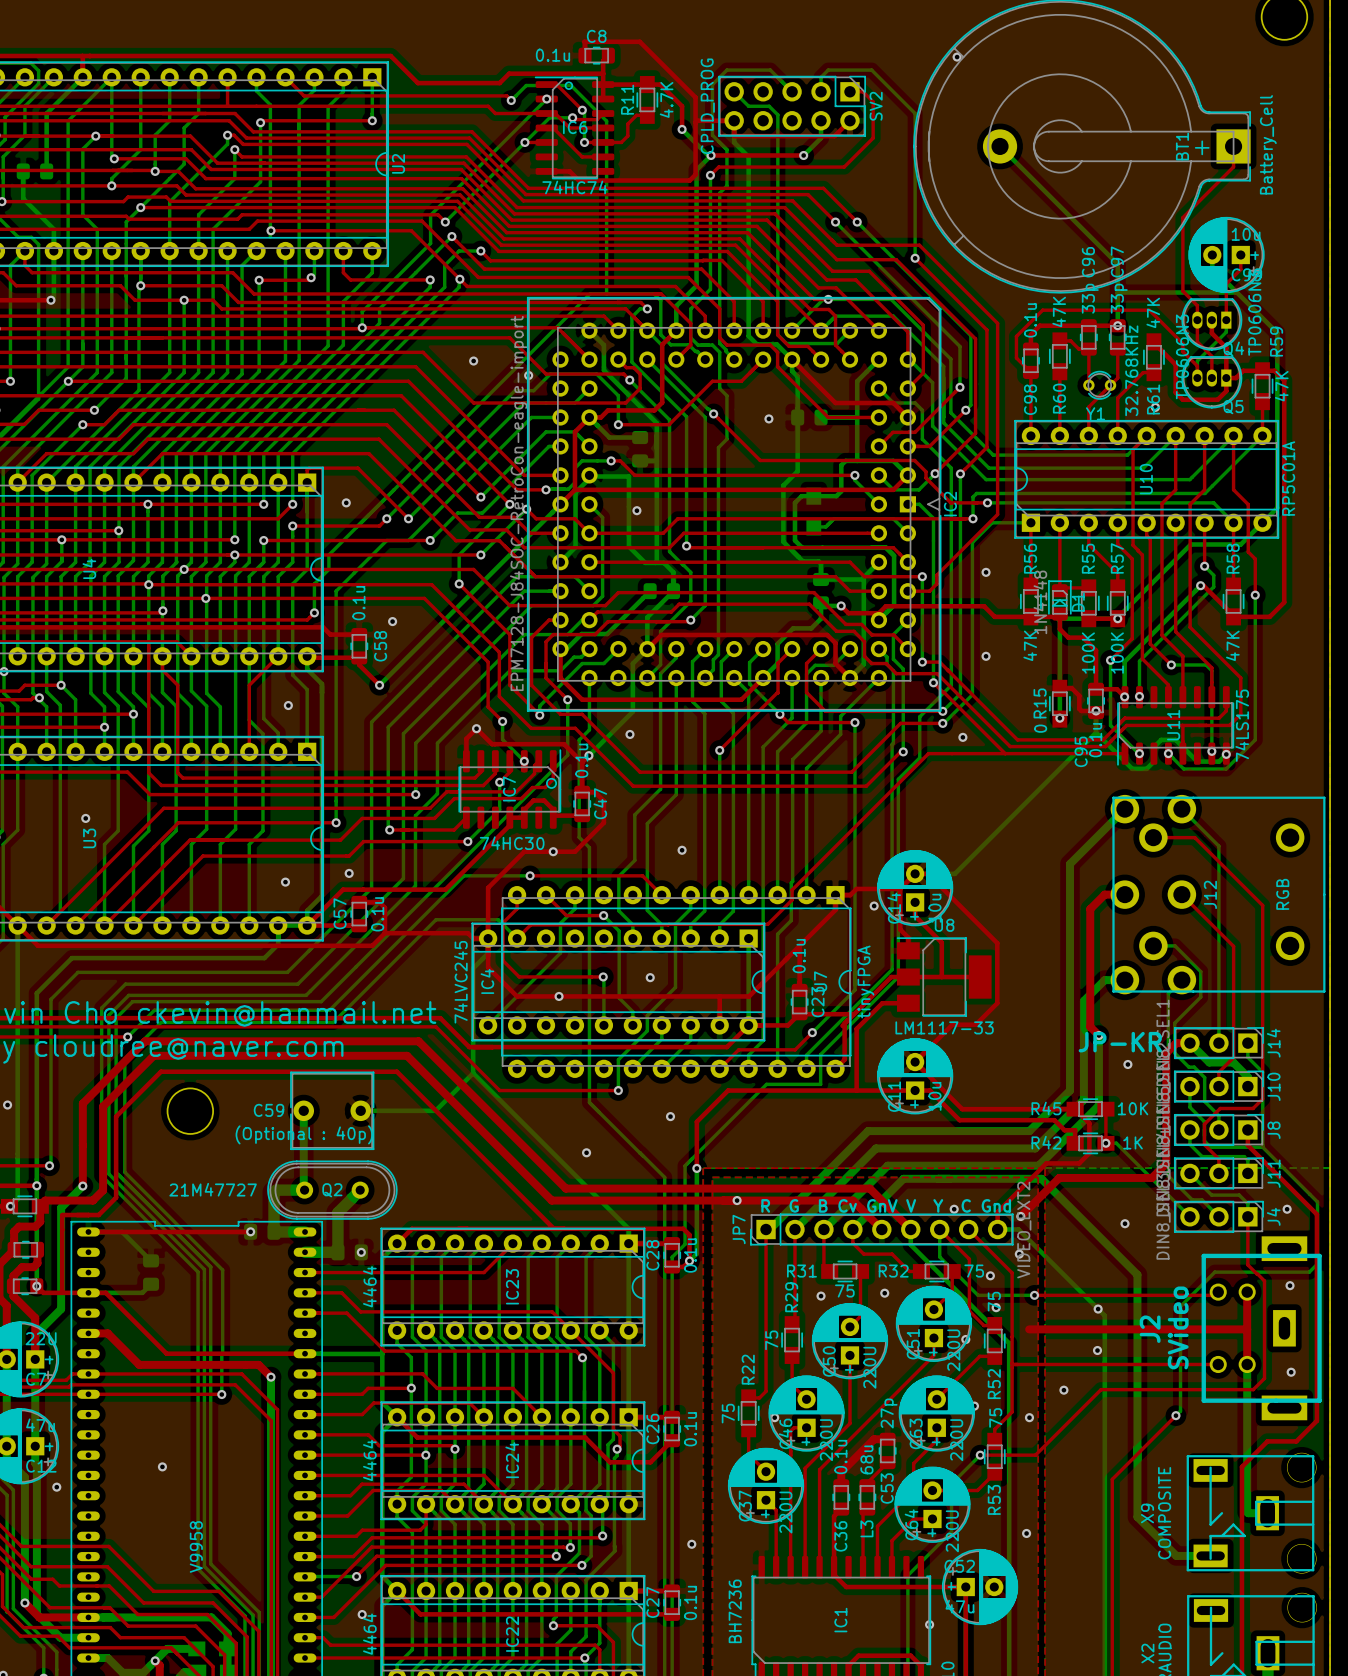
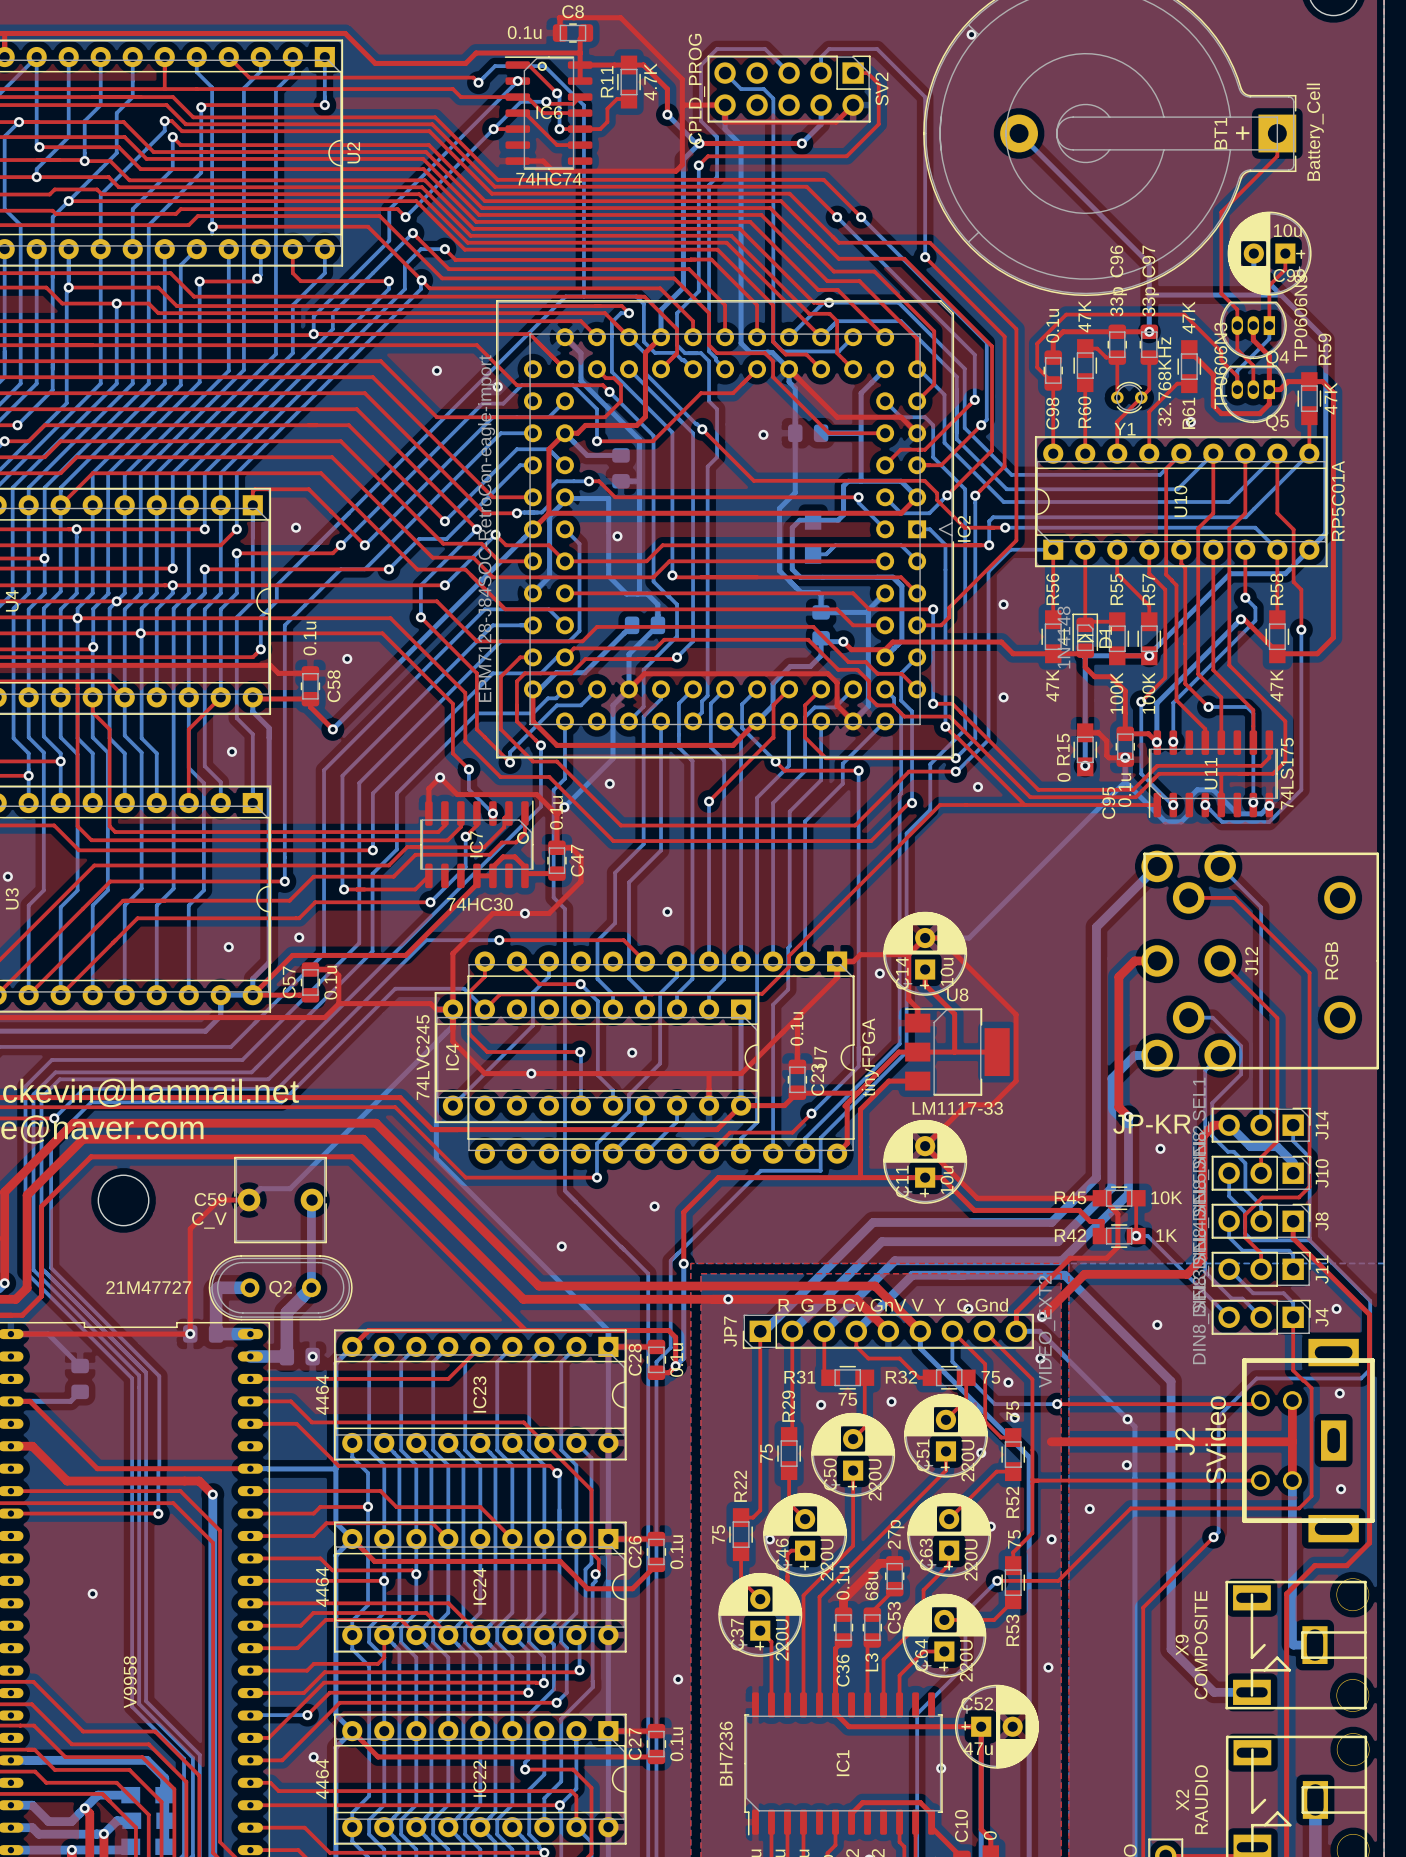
bottom track: (473, 1073) (435, 1110) (360, 1110) -> none
bottom track: (303, 1110) (304, 1190) -> (249, 1200) (260, 1188) (290, 1188) (436, 1042)
top track: none -> (249, 1200) (219, 1200) (190, 1228) (190, 1333)
bottom track: none -> (311, 1200) (311, 1287)
C59 value: (Optional : 40p) (304, 1134) -> C_V (209, 1220)

